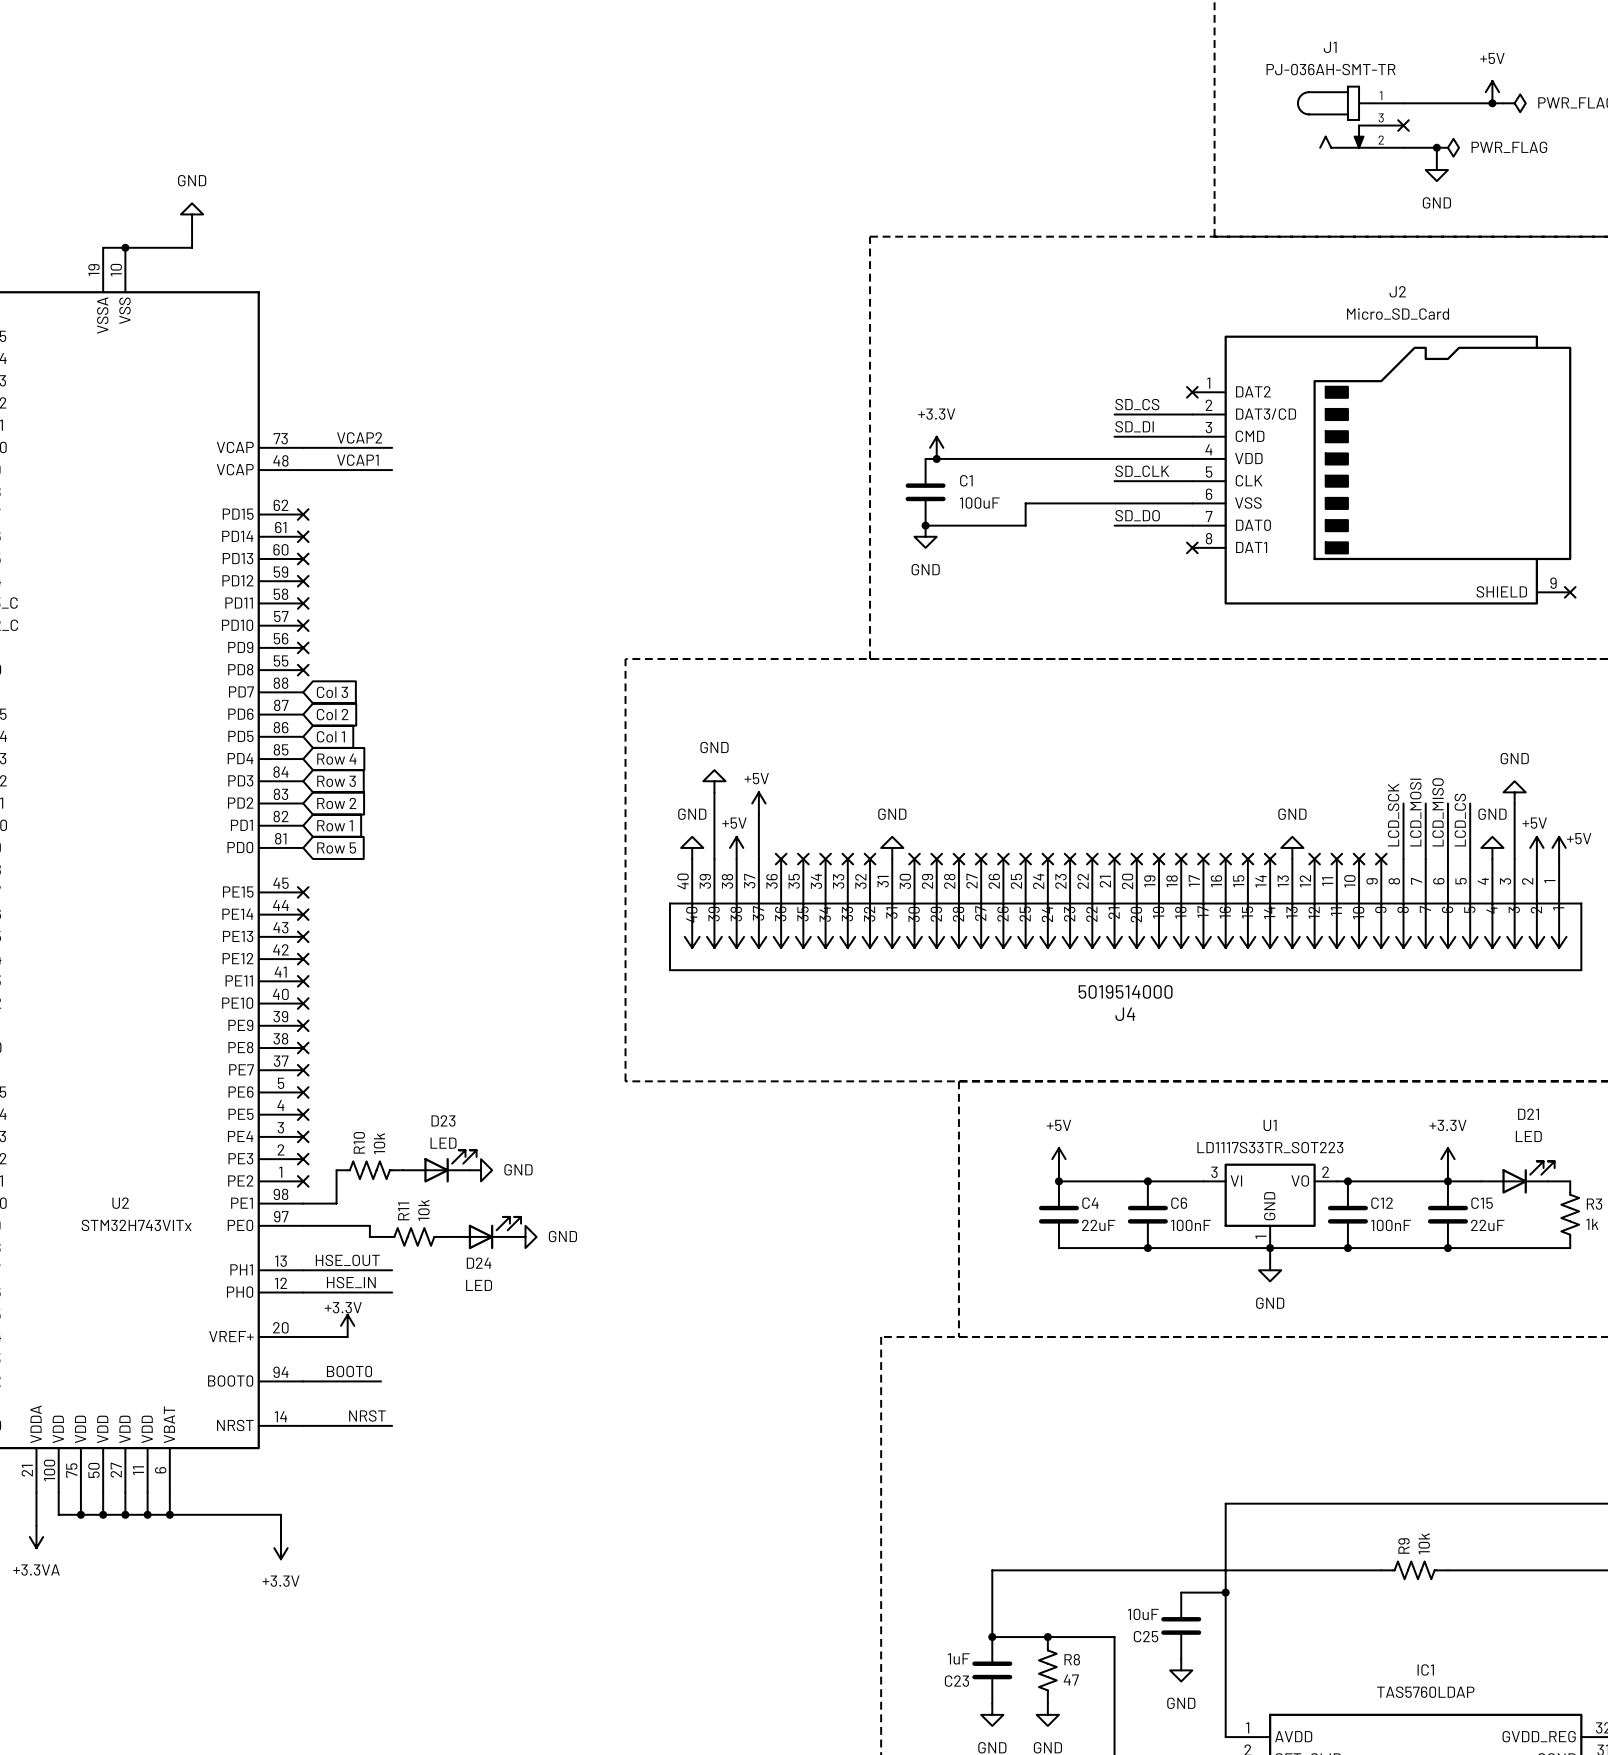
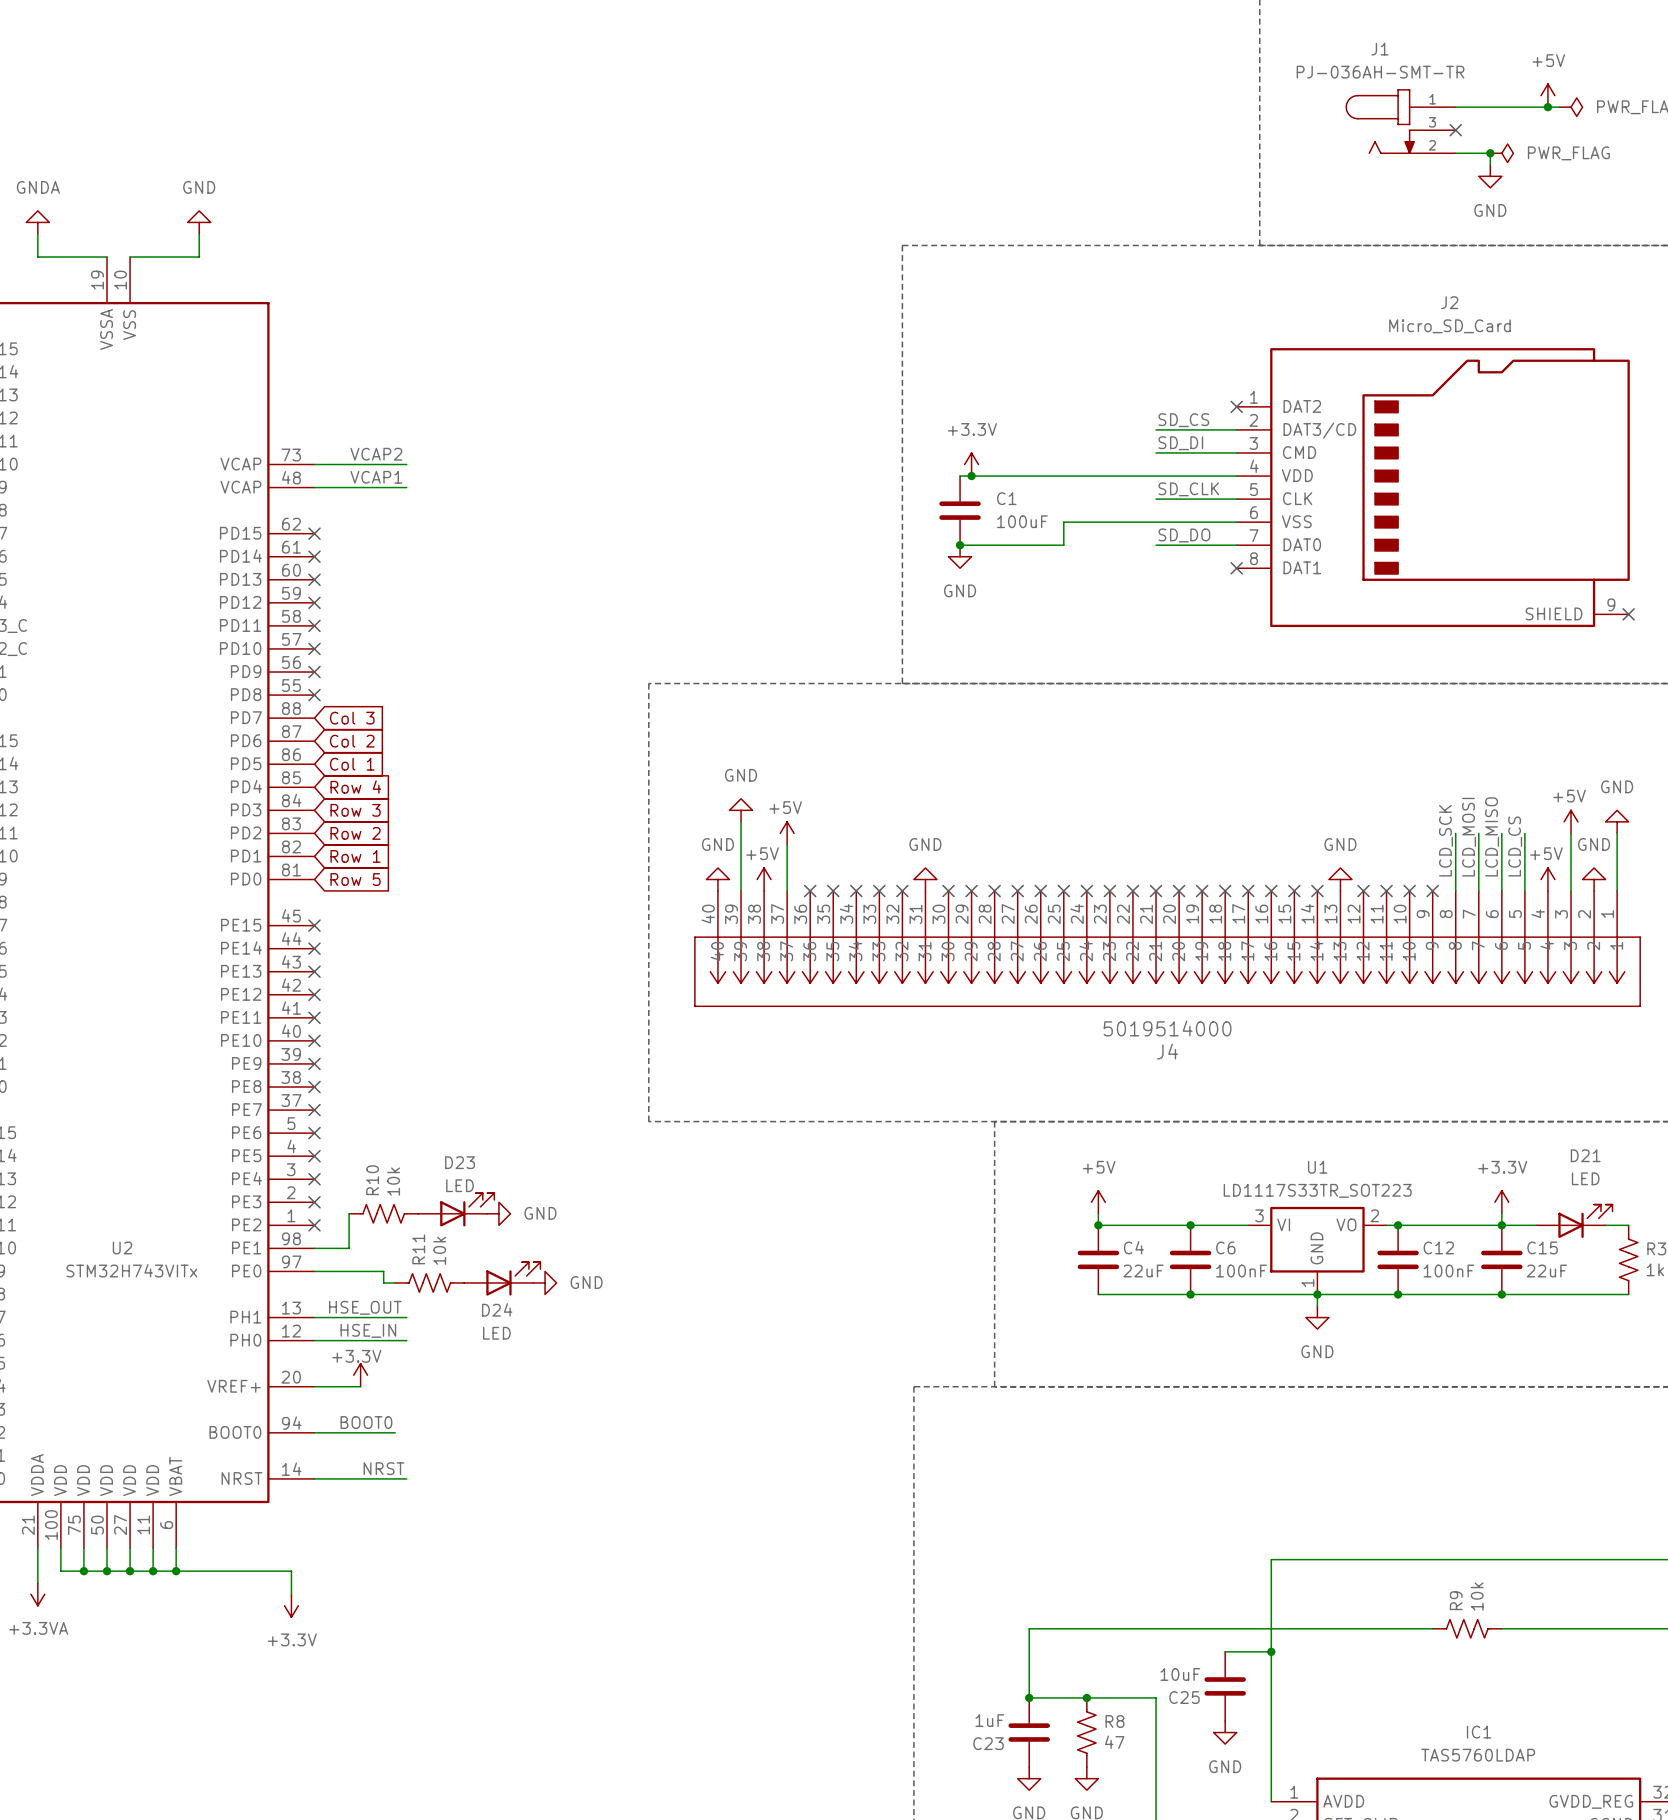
power symbol: none -> GNDA (37, 222)
wire: (103, 247) (125, 247) -> (107, 257) (37, 257) (37, 233)
junction: (125, 247) -> none
power symbol: GND (1514, 792) -> +5V (1571, 821)
power symbol: none -> GND (1617, 821)
wire: none -> (1617, 833) (1617, 891)
power symbol: GND (1492, 847) -> +5V (1547, 879)
power symbol: +5V (1536, 847) -> GND (1594, 879)
power symbol: +5V (1559, 847) -> none

